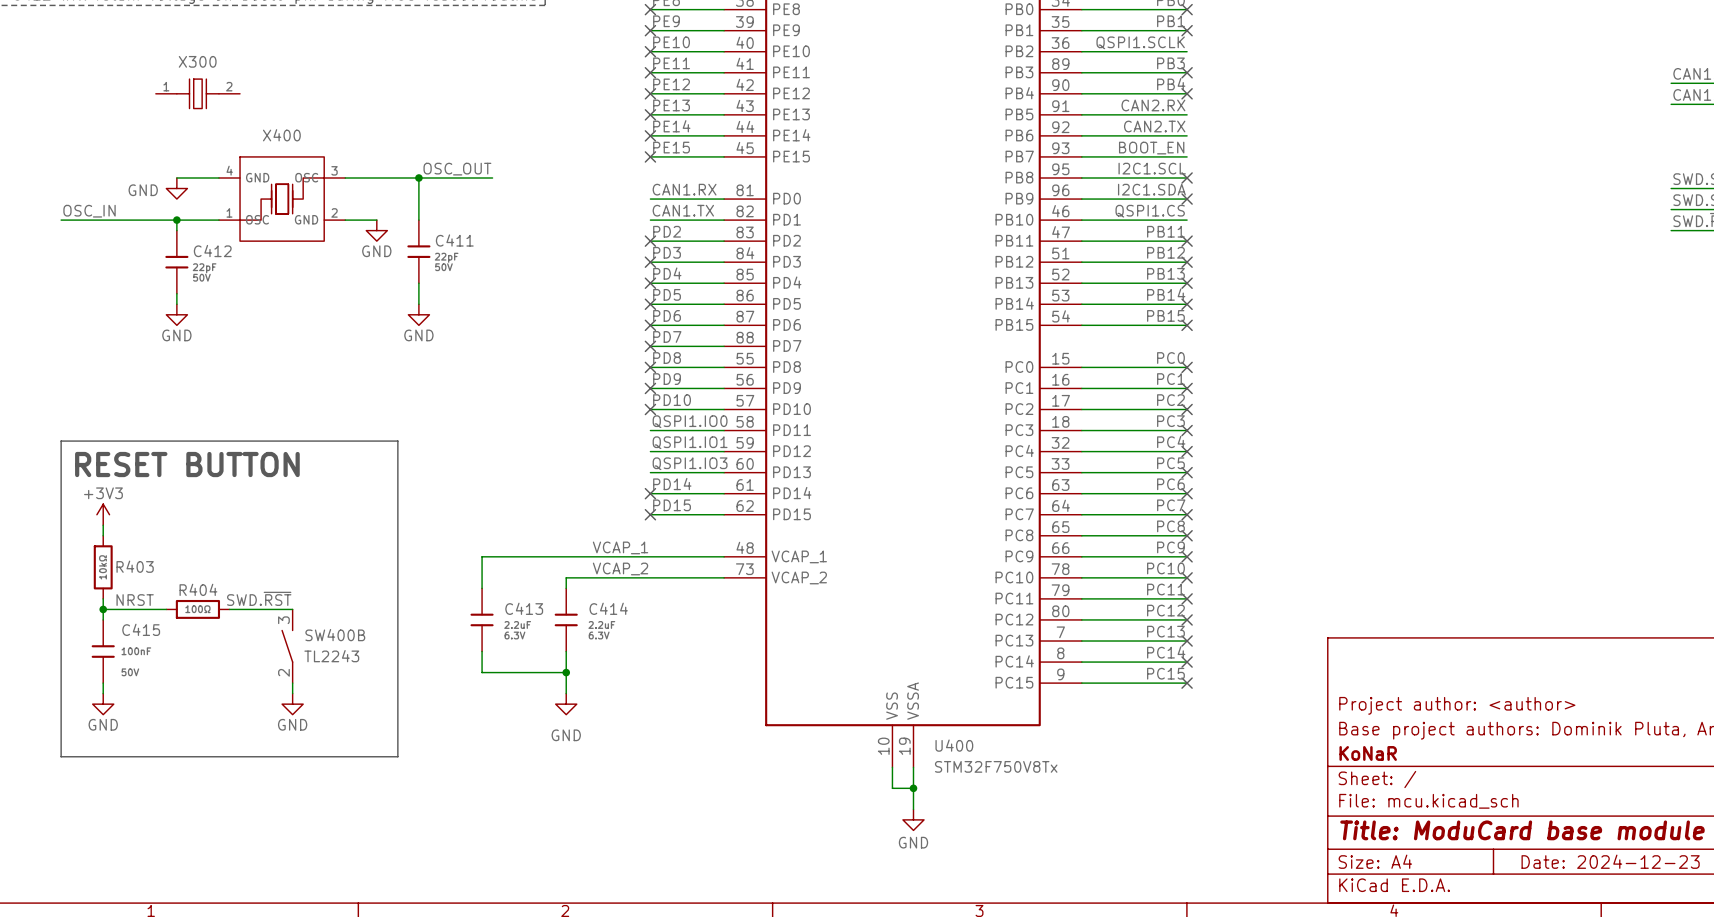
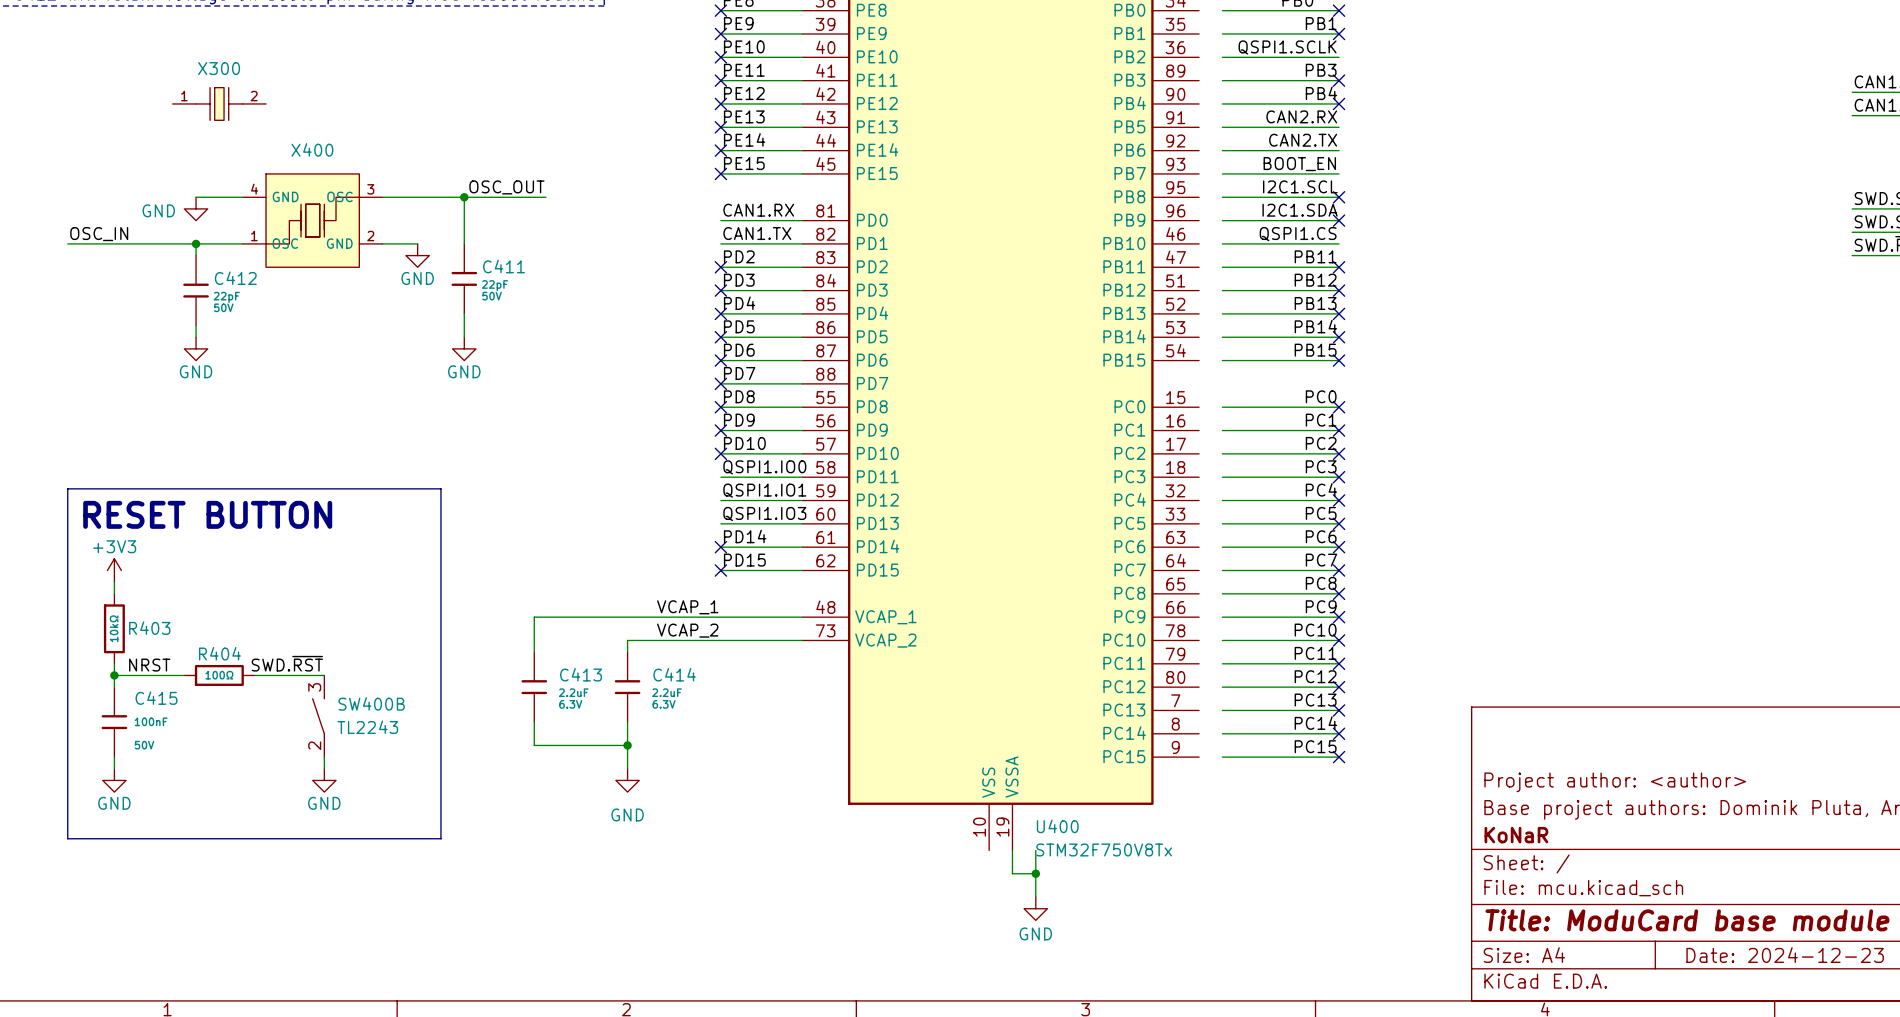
wire: (1081, 9) (1102, 9) -> (1315, 10) (1339, 10)
no-connect mark: (1187, 9) -> none
no-connect mark: none -> (1339, 10)
label position: PB1 (1170, 21) -> PB1 (1321, 23)
wire: (1081, 30) (1102, 30) -> (1315, 34) (1339, 34)
no-connect mark: (1187, 30) -> none
no-connect mark: none -> (1339, 34)
label position: QSPI1.SCLK (1140, 42) -> QSPI1.SCLK (1287, 47)
wire: (1081, 51) (1102, 51) -> (1315, 57) (1339, 57)
label position: PB3 (1170, 63) -> PB3 (1321, 70)
wire: (1081, 72) (1102, 72) -> (1315, 80) (1339, 80)
no-connect mark: (1187, 72) -> none
no-connect mark: none -> (1339, 80)
label position: PB4 (1171, 84) -> PB4 (1321, 93)
wire: (1081, 93) (1102, 93) -> (1315, 103) (1339, 103)
no-connect mark: (1187, 93) -> none
no-connect mark: none -> (1339, 103)
label position: CAN2.RX (1153, 105) -> CAN2.RX (1301, 116)
wire: (1081, 114) (1102, 114) -> (1315, 127) (1339, 127)
label position: CAN2.TX (1154, 126) -> CAN2.TX (1303, 140)
wire: (1081, 135) (1102, 135) -> (1315, 150) (1339, 150)
label position: BOOT_EN (1151, 148) -> BOOT_EN (1299, 164)
wire: (1081, 156) (1102, 156) -> (1315, 173) (1339, 173)
label position: I2C1.SCL (1152, 168) -> I2C1.SCL (1300, 186)
wire: (1081, 178) (1102, 178) -> (1315, 197) (1339, 197)
no-connect mark: (1187, 178) -> none
no-connect mark: none -> (1339, 197)
label position: I2C1.SDA (1151, 189) -> I2C1.SDA (1300, 210)
wire: (1081, 199) (1102, 199) -> (1315, 220) (1339, 220)
no-connect mark: (1187, 199) -> none
no-connect mark: none -> (1339, 220)
label position: QSPI1.CS (1150, 211) -> QSPI1.CS (1298, 234)
wire: (1081, 220) (1102, 220) -> (1315, 243) (1339, 243)
label position: PB11 (1165, 231) -> PB11 (1315, 256)
wire: (1081, 241) (1102, 241) -> (1315, 267) (1339, 267)
no-connect mark: (1187, 241) -> none
no-connect mark: none -> (1339, 267)
label position: PB12 (1165, 252) -> PB12 (1315, 280)
wire: (1081, 262) (1102, 262) -> (1315, 290) (1339, 290)
no-connect mark: (1187, 262) -> none
no-connect mark: none -> (1339, 290)
label position: PB13 (1165, 273) -> PB13 (1315, 303)
wire: (1081, 283) (1102, 283) -> (1315, 313) (1339, 313)
no-connect mark: (1187, 283) -> none
no-connect mark: none -> (1339, 313)
label position: PB14 (1166, 294) -> PB14 (1315, 326)
wire: (1081, 304) (1102, 304) -> (1315, 337) (1339, 337)
no-connect mark: (1187, 304) -> none
no-connect mark: none -> (1339, 337)
label position: PB15 (1165, 315) -> PB15 (1315, 350)
wire: (1081, 325) (1102, 325) -> (1315, 360) (1339, 360)
no-connect mark: (1187, 325) -> none
no-connect mark: none -> (1339, 360)
label position: PC0 (1170, 358) -> PC0 (1321, 396)
wire: (1081, 367) (1102, 367) -> (1315, 407) (1339, 407)
no-connect mark: (1187, 367) -> none
no-connect mark: none -> (1339, 407)
label position: PC1 (1170, 379) -> PC1 (1321, 420)
wire: (1081, 388) (1102, 388) -> (1315, 430) (1339, 430)
no-connect mark: (1187, 388) -> none
no-connect mark: none -> (1339, 430)
label position: PC2 (1170, 400) -> PC2 (1321, 443)
wire: (1081, 409) (1102, 409) -> (1315, 453) (1339, 453)
no-connect mark: (1187, 409) -> none
no-connect mark: none -> (1339, 453)
label position: PC3 (1170, 421) -> PC3 (1321, 466)
wire: (1081, 430) (1102, 430) -> (1315, 477) (1339, 477)
no-connect mark: (1187, 430) -> none
no-connect mark: none -> (1339, 477)
label position: PC4 (1171, 441) -> PC4 (1321, 489)
wire: (1081, 451) (1102, 451) -> (1315, 500) (1339, 500)
no-connect mark: (1187, 451) -> none
no-connect mark: none -> (1339, 500)
label position: PC5 (1170, 463) -> PC5 (1321, 513)
wire: (1081, 472) (1102, 472) -> (1315, 523) (1339, 523)
no-connect mark: (1187, 472) -> none
no-connect mark: none -> (1339, 523)
label position: PC6 (1170, 484) -> PC6 (1321, 536)
wire: (1081, 493) (1102, 493) -> (1315, 547) (1339, 547)
no-connect mark: (1187, 493) -> none
no-connect mark: none -> (1339, 547)
label position: PC7 (1171, 505) -> PC7 (1321, 560)
wire: (1081, 514) (1102, 514) -> (1315, 570) (1339, 570)
no-connect mark: (1187, 514) -> none
no-connect mark: none -> (1339, 570)
label position: PC8 (1170, 526) -> PC8 (1321, 583)
wire: (1081, 535) (1102, 535) -> (1315, 593) (1339, 593)
no-connect mark: (1187, 535) -> none
no-connect mark: none -> (1339, 593)
label position: PC9 (1170, 547) -> PC9 (1321, 606)
wire: (1081, 556) (1102, 556) -> (1315, 617) (1339, 617)
no-connect mark: (1187, 556) -> none
no-connect mark: none -> (1339, 617)
label position: PC10 (1165, 568) -> PC10 (1315, 630)
wire: (1081, 577) (1102, 577) -> (1315, 640) (1339, 640)
no-connect mark: (1187, 577) -> none
no-connect mark: none -> (1339, 640)
label position: PC11 (1165, 589) -> PC11 (1315, 653)
wire: (1081, 598) (1102, 598) -> (1315, 663) (1339, 663)
no-connect mark: (1187, 598) -> none
no-connect mark: none -> (1339, 663)
label position: PC12 (1165, 610) -> PC12 (1315, 676)
wire: (1081, 619) (1102, 619) -> (1315, 687) (1339, 687)
no-connect mark: (1187, 619) -> none
no-connect mark: none -> (1339, 687)
label position: PC13 (1165, 631) -> PC13 (1315, 700)
wire: (1081, 641) (1102, 641) -> (1315, 710) (1339, 710)
no-connect mark: (1187, 641) -> none
no-connect mark: none -> (1339, 710)
label position: PC14 (1166, 652) -> PC14 (1315, 723)
wire: (1081, 662) (1102, 662) -> (1315, 733) (1339, 733)
no-connect mark: (1187, 662) -> none
no-connect mark: none -> (1339, 733)
label position: PC15 (1165, 673) -> PC15 (1315, 746)
wire: (1081, 683) (1102, 683) -> (1315, 757) (1339, 757)
no-connect mark: (1187, 683) -> none
no-connect mark: none -> (1339, 757)
wire: (892, 767) (892, 788) (913, 788) (913, 809) -> none
wire: none -> (1035, 850) (1035, 897)
wire: none -> (1012, 873) (1035, 873)
junction position: (913, 788) -> (1035, 873)
power symbol position: GND (913, 819) -> GND (1035, 908)

